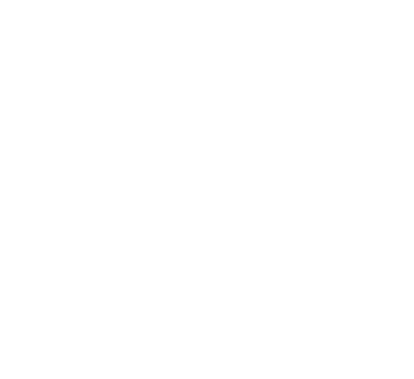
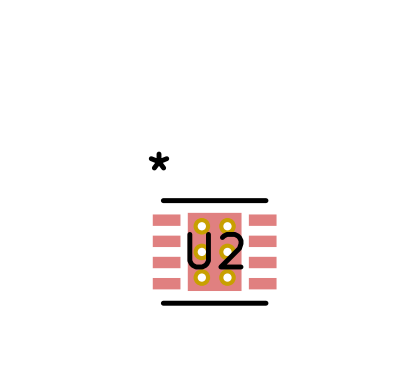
U2: none -> (214, 251)

